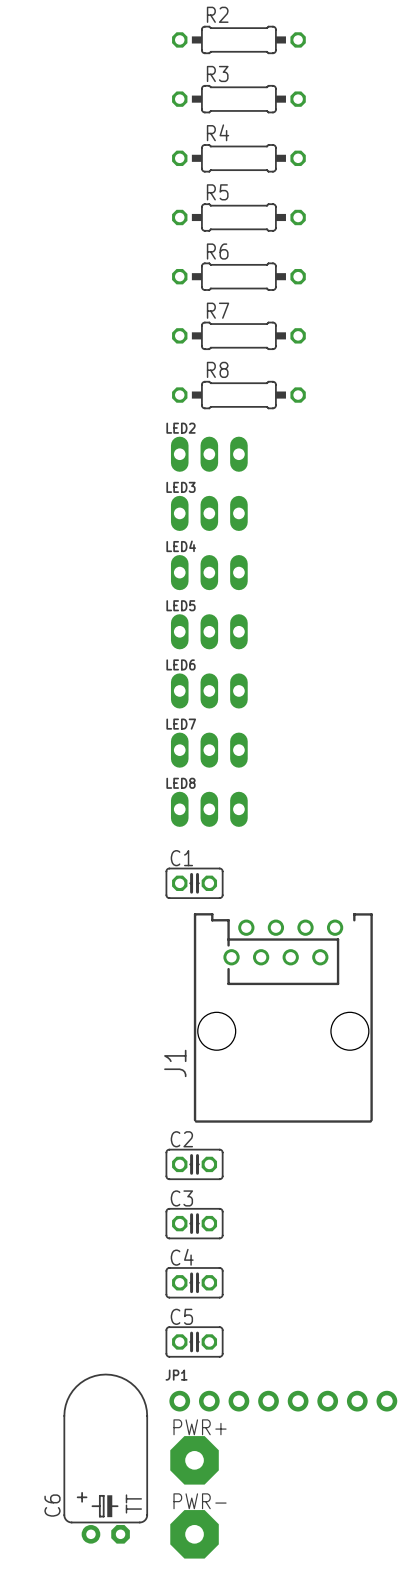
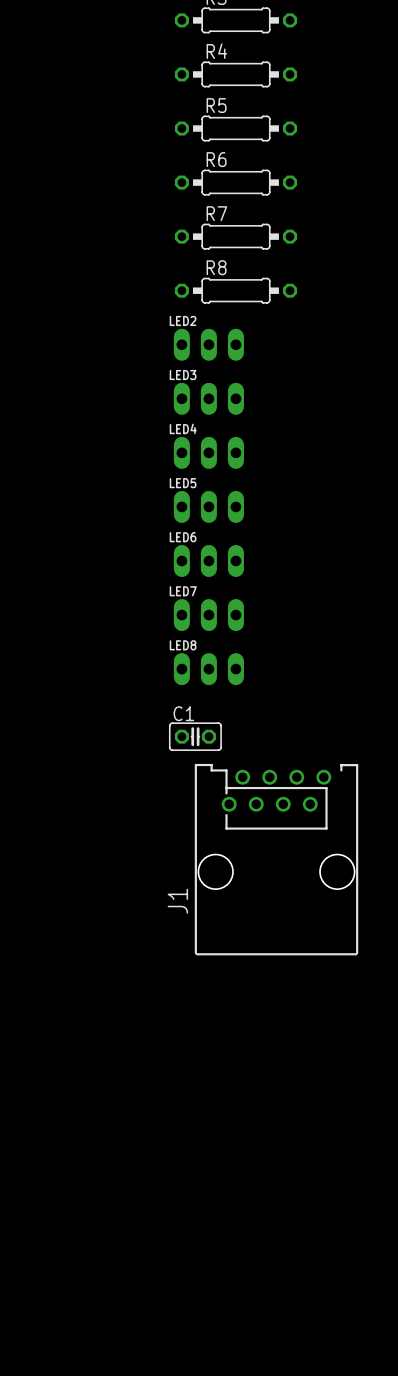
C2: (194, 1164) -> none
C3: (194, 1223) -> none
C4: (194, 1282) -> none
C5: (194, 1341) -> none
JP1: (283, 1401) -> none
C6: (105, 1458) -> none
PWR+: (194, 1460) -> none
PWR-: (194, 1534) -> none

